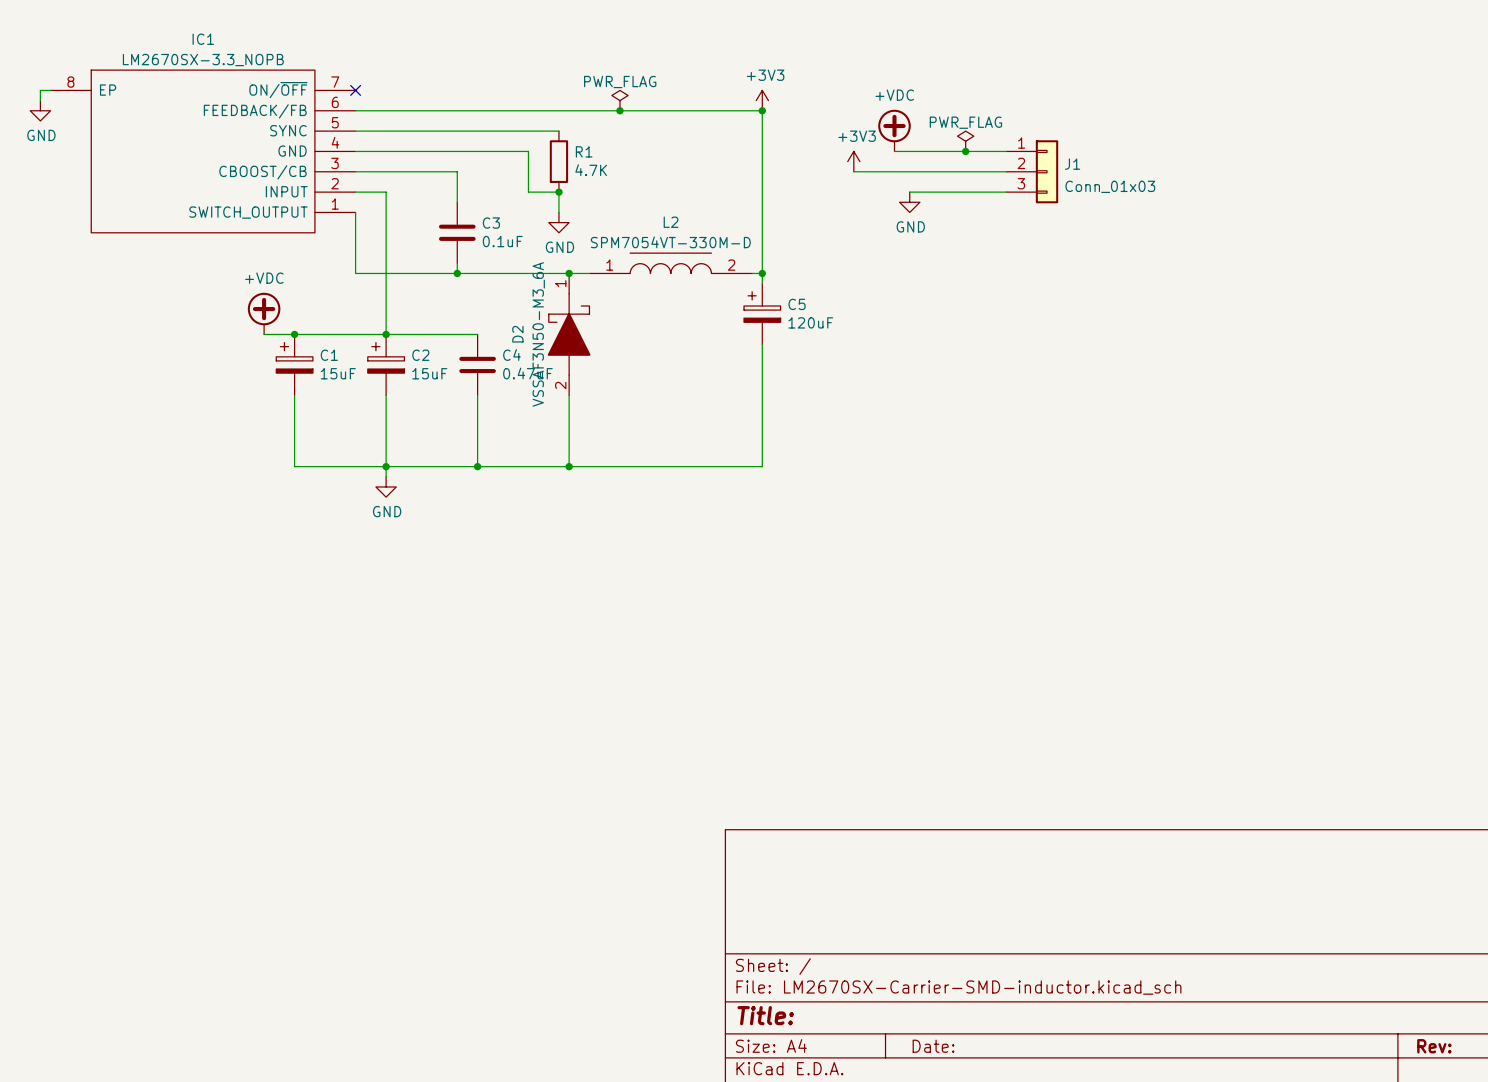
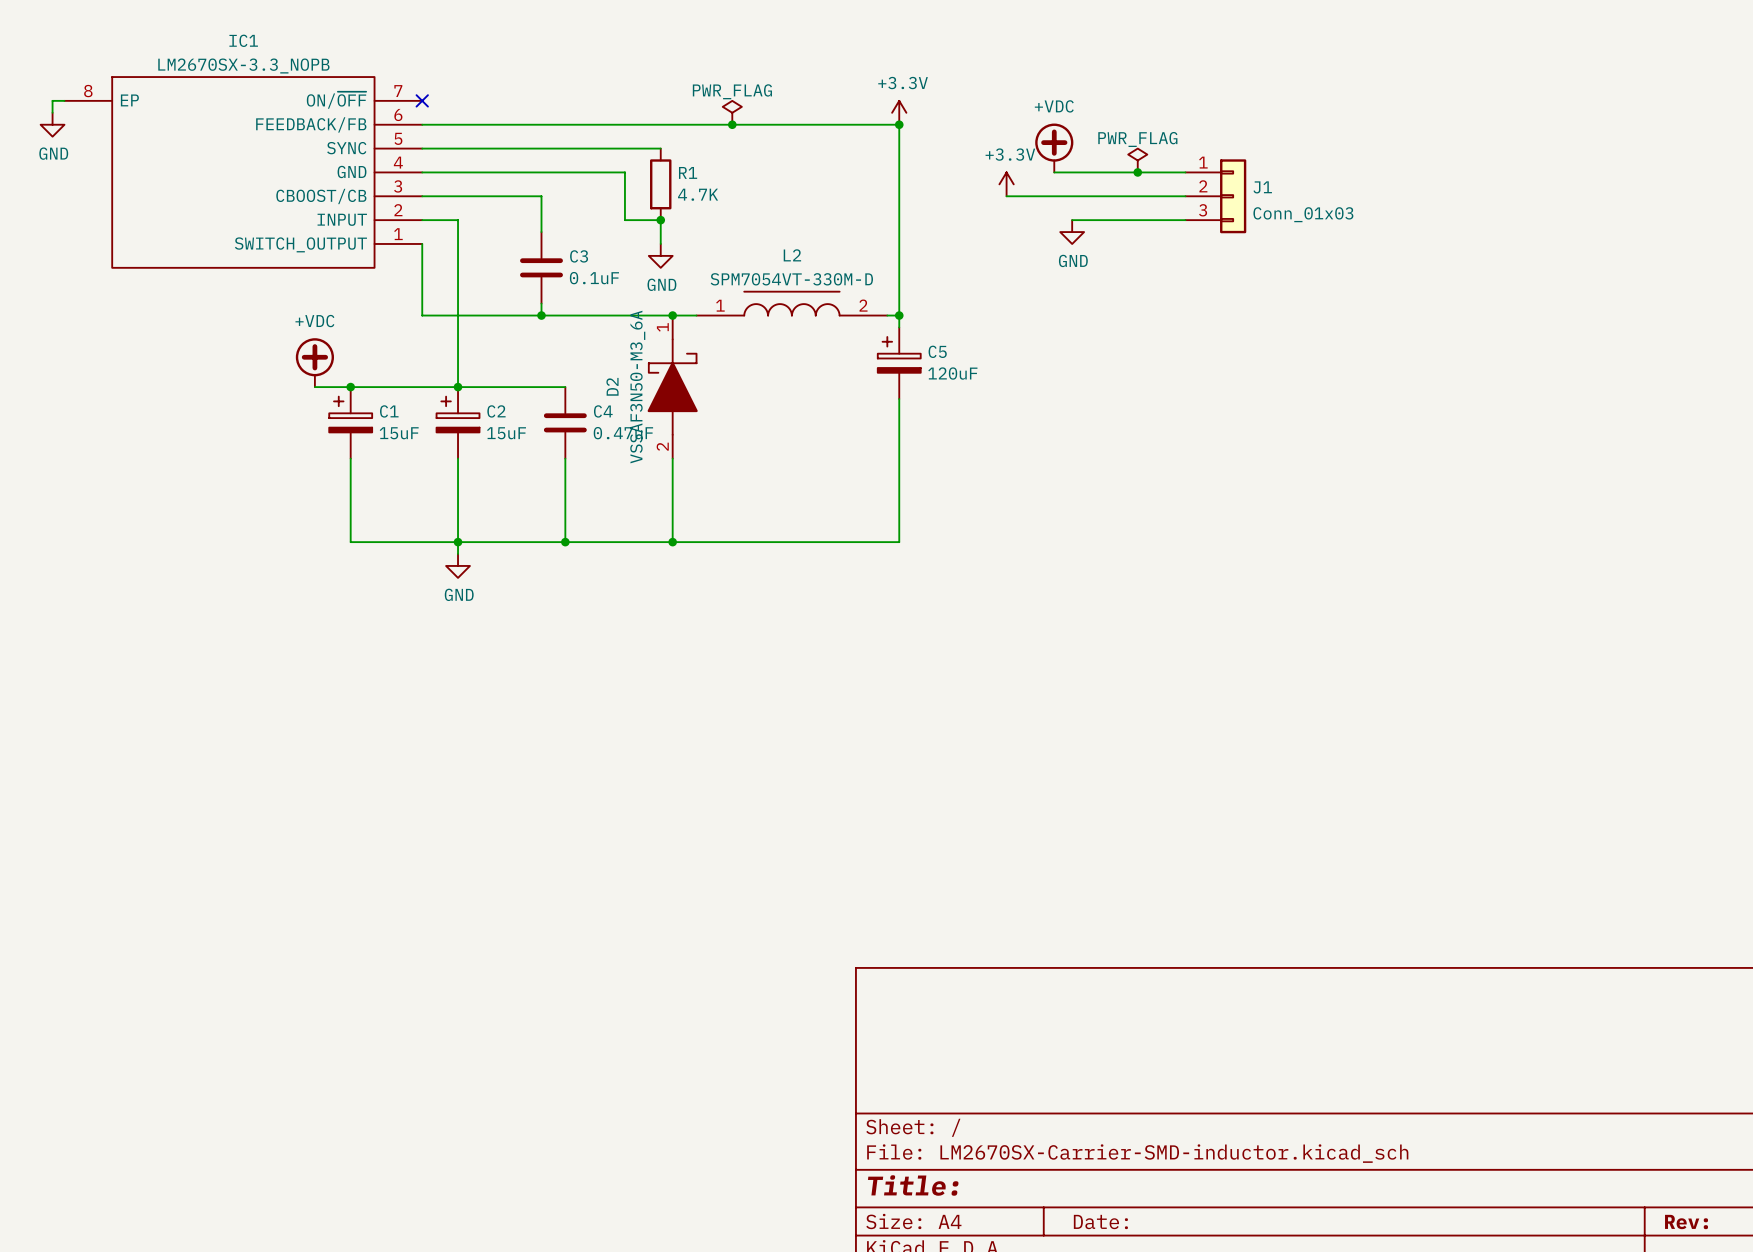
power symbol: +3V3 (762, 100) -> +3.3V (899, 112)
power symbol: +3V3 (853, 161) -> +3.3V (1006, 184)

